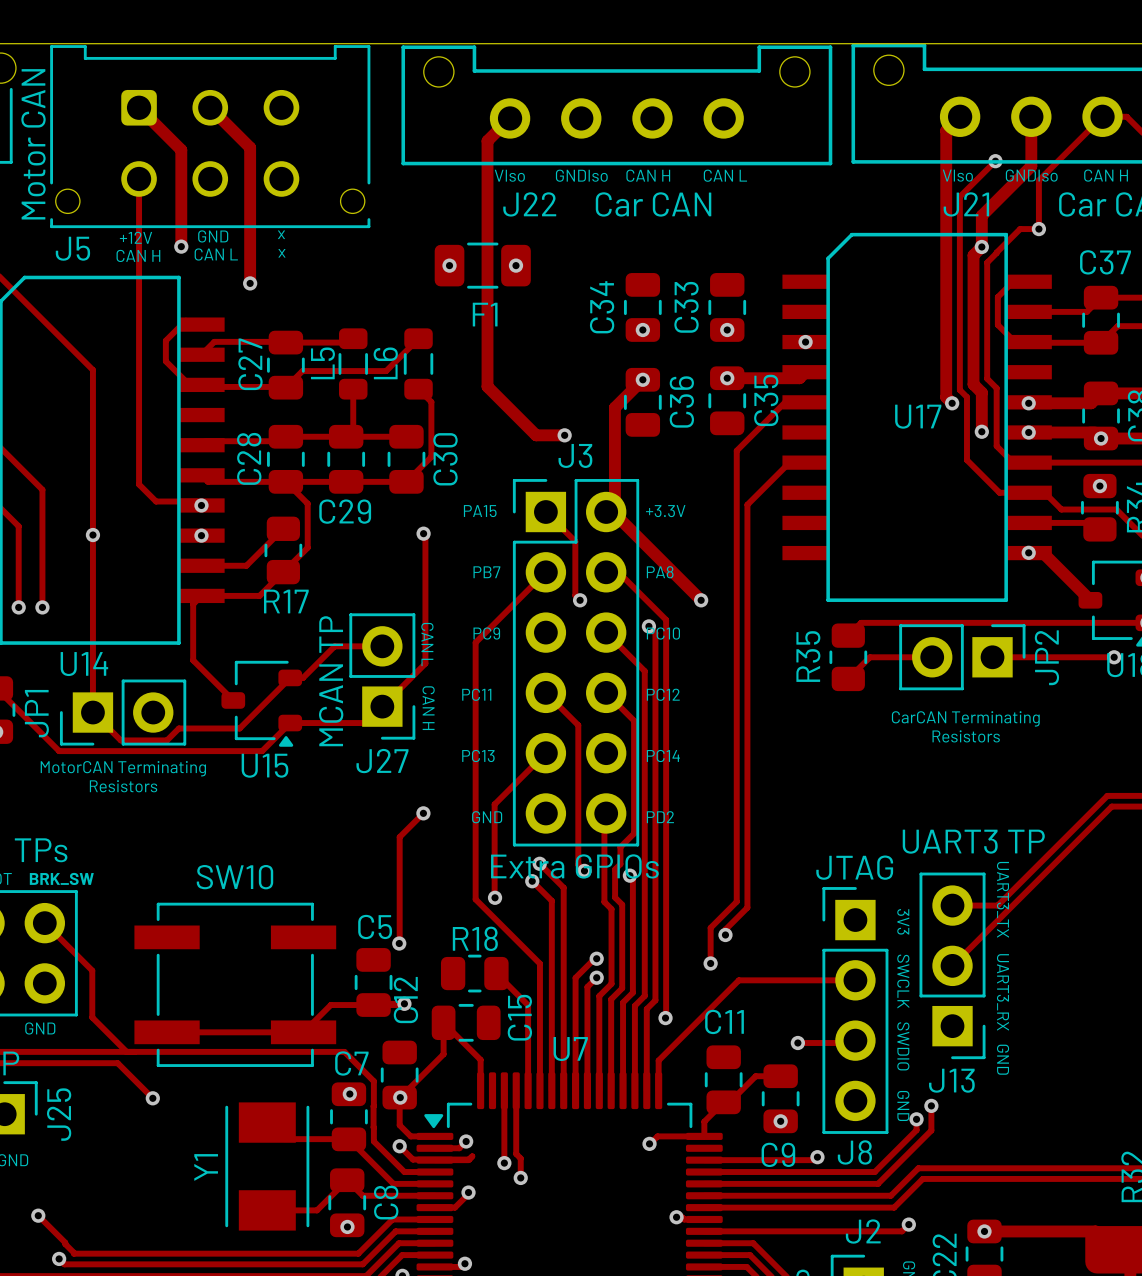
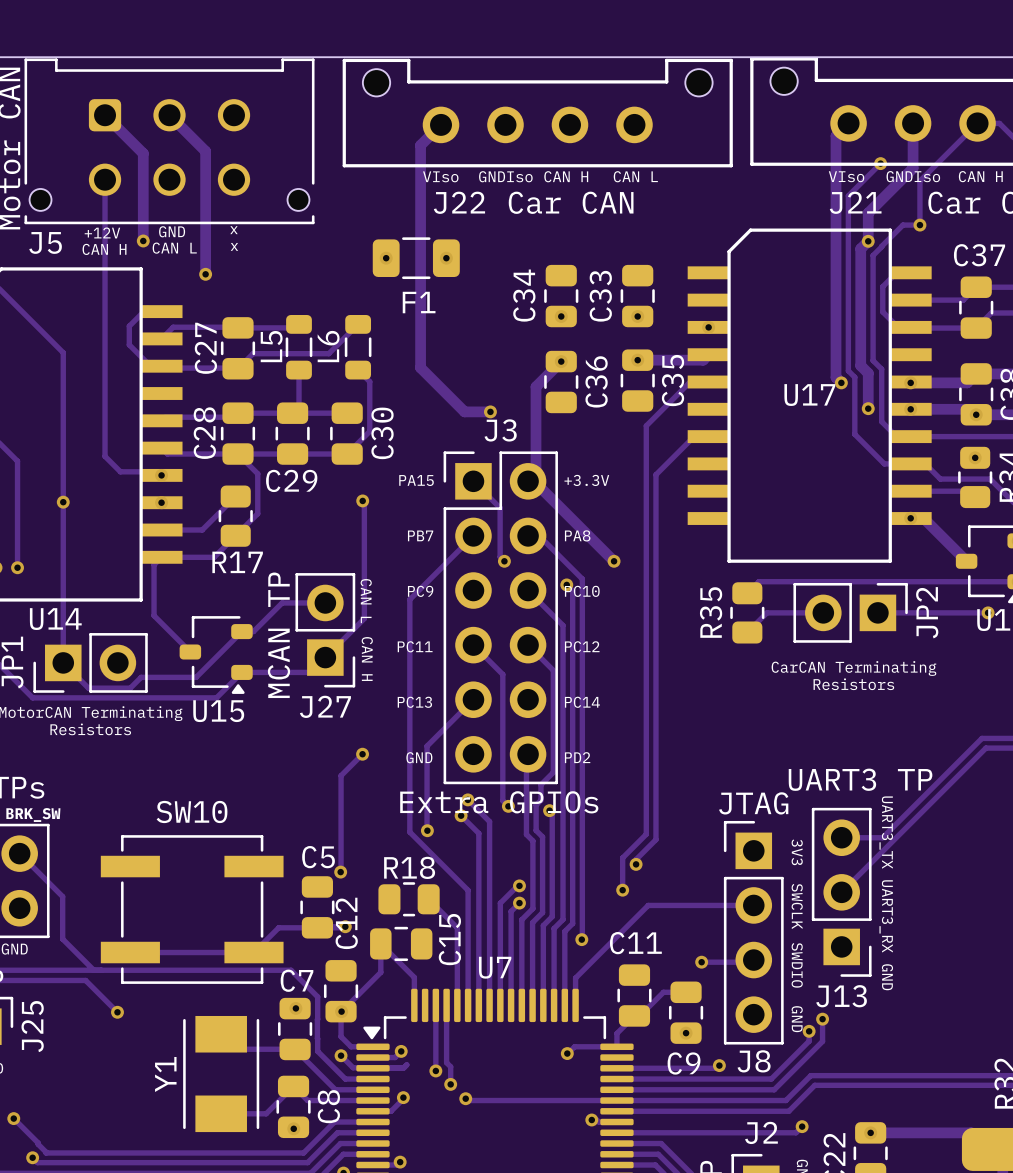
track: none -> (465, 1098) (467, 1100) (616, 1100)
via: none -> (465, 1098)

